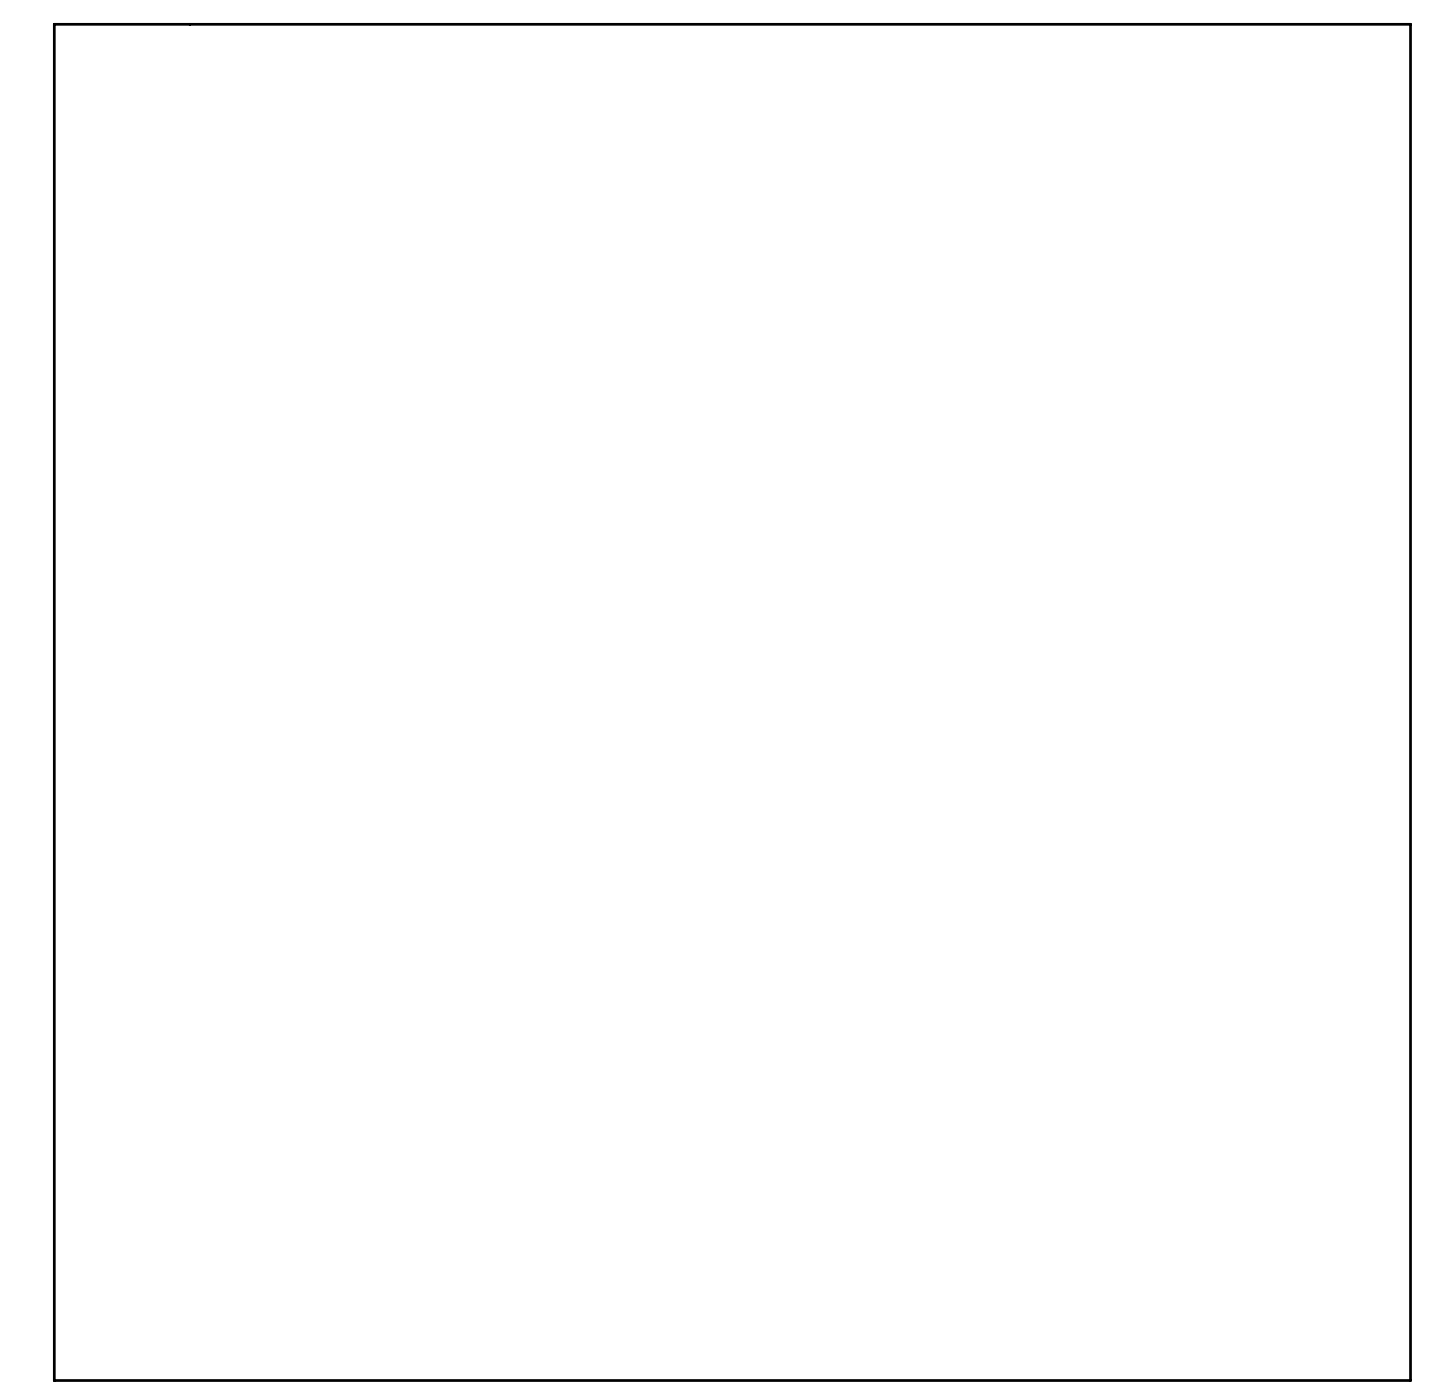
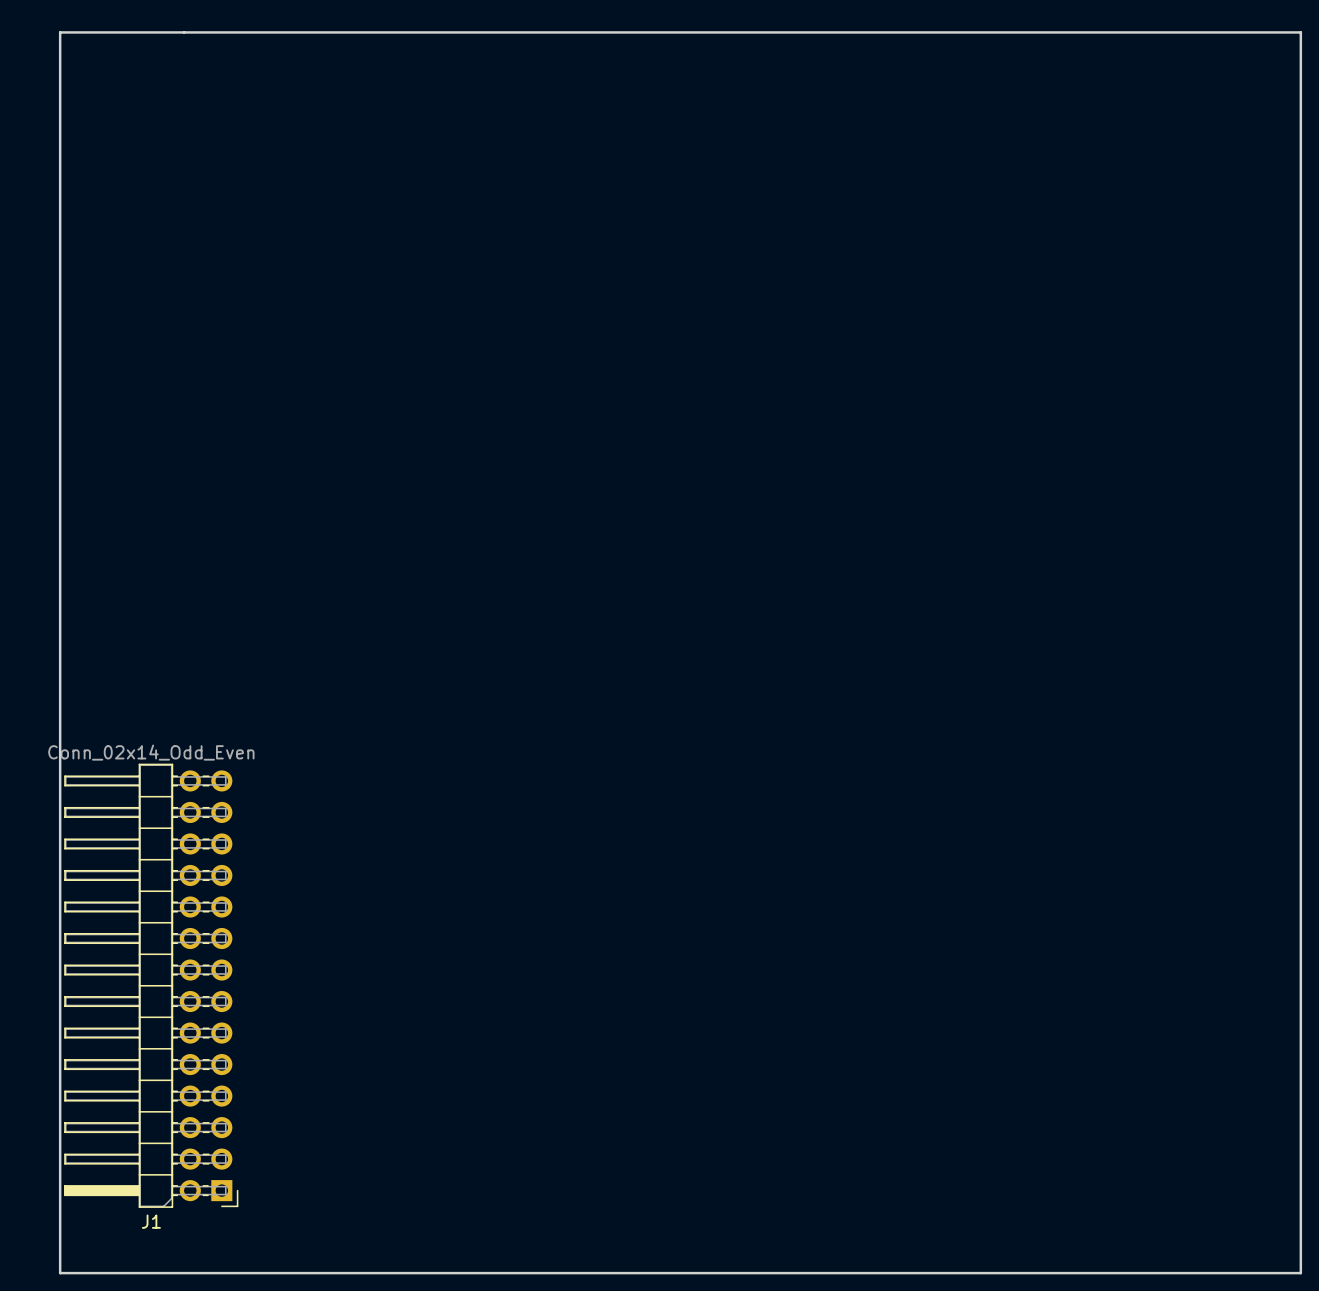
J1: none -> Conn_02x14_Odd_Even (151, 985)

